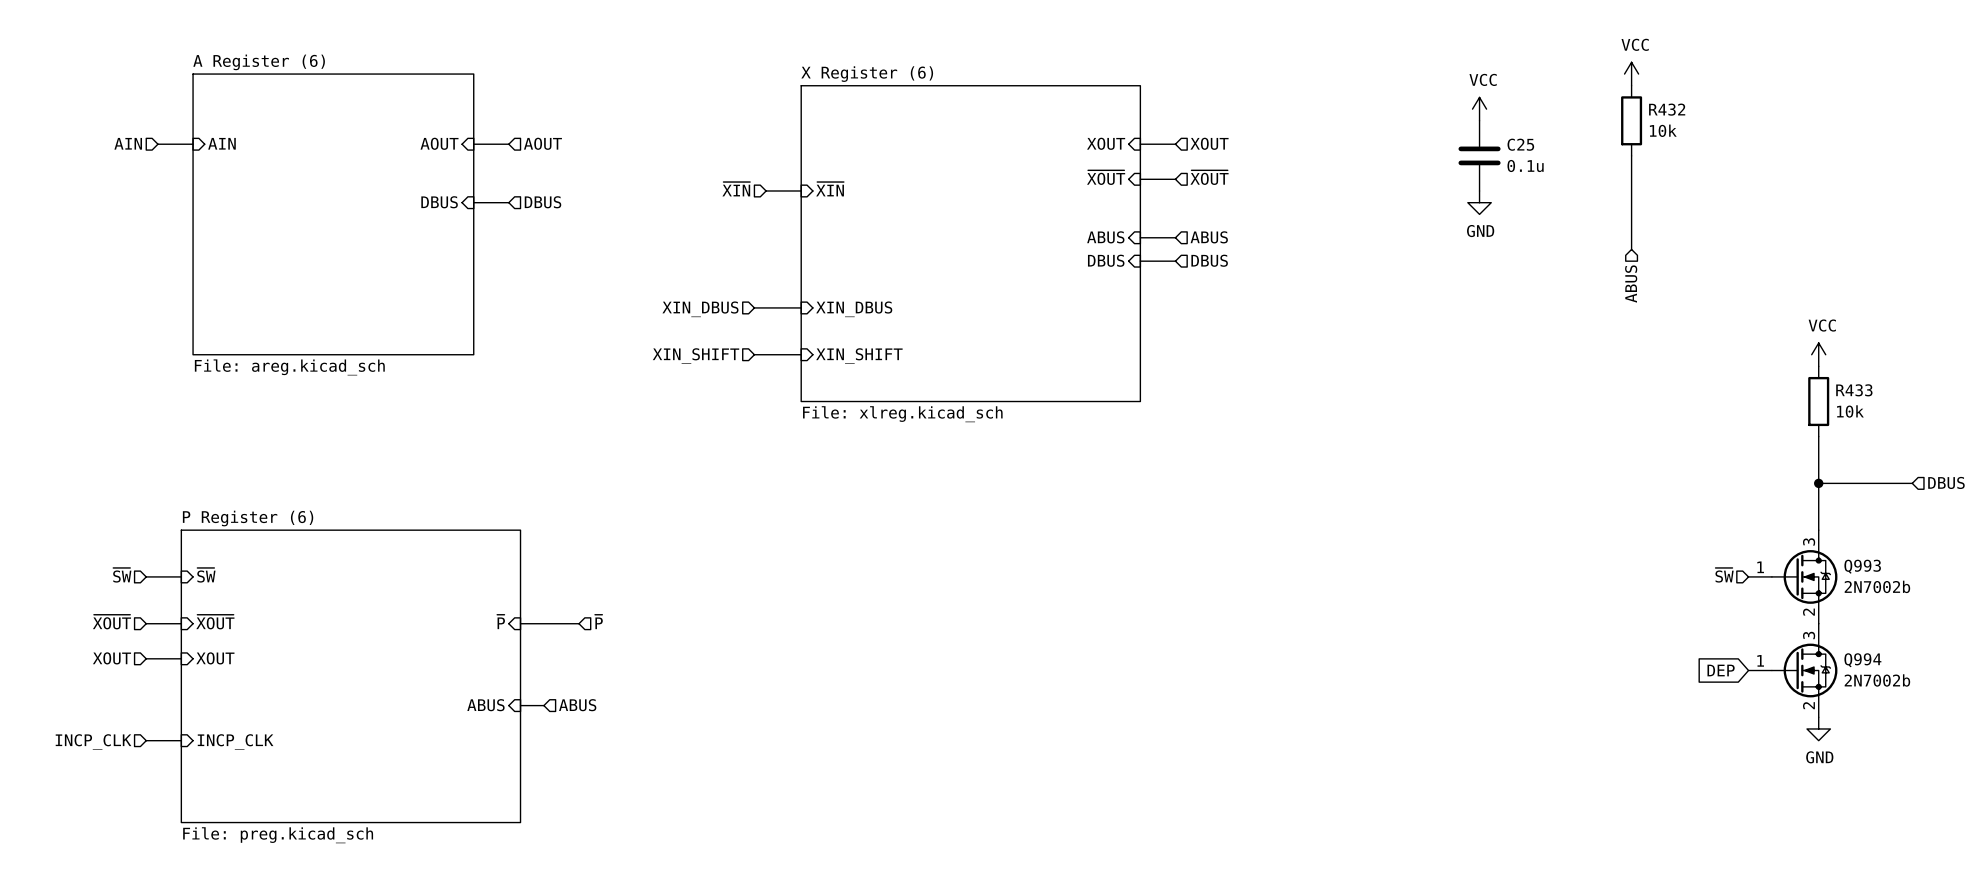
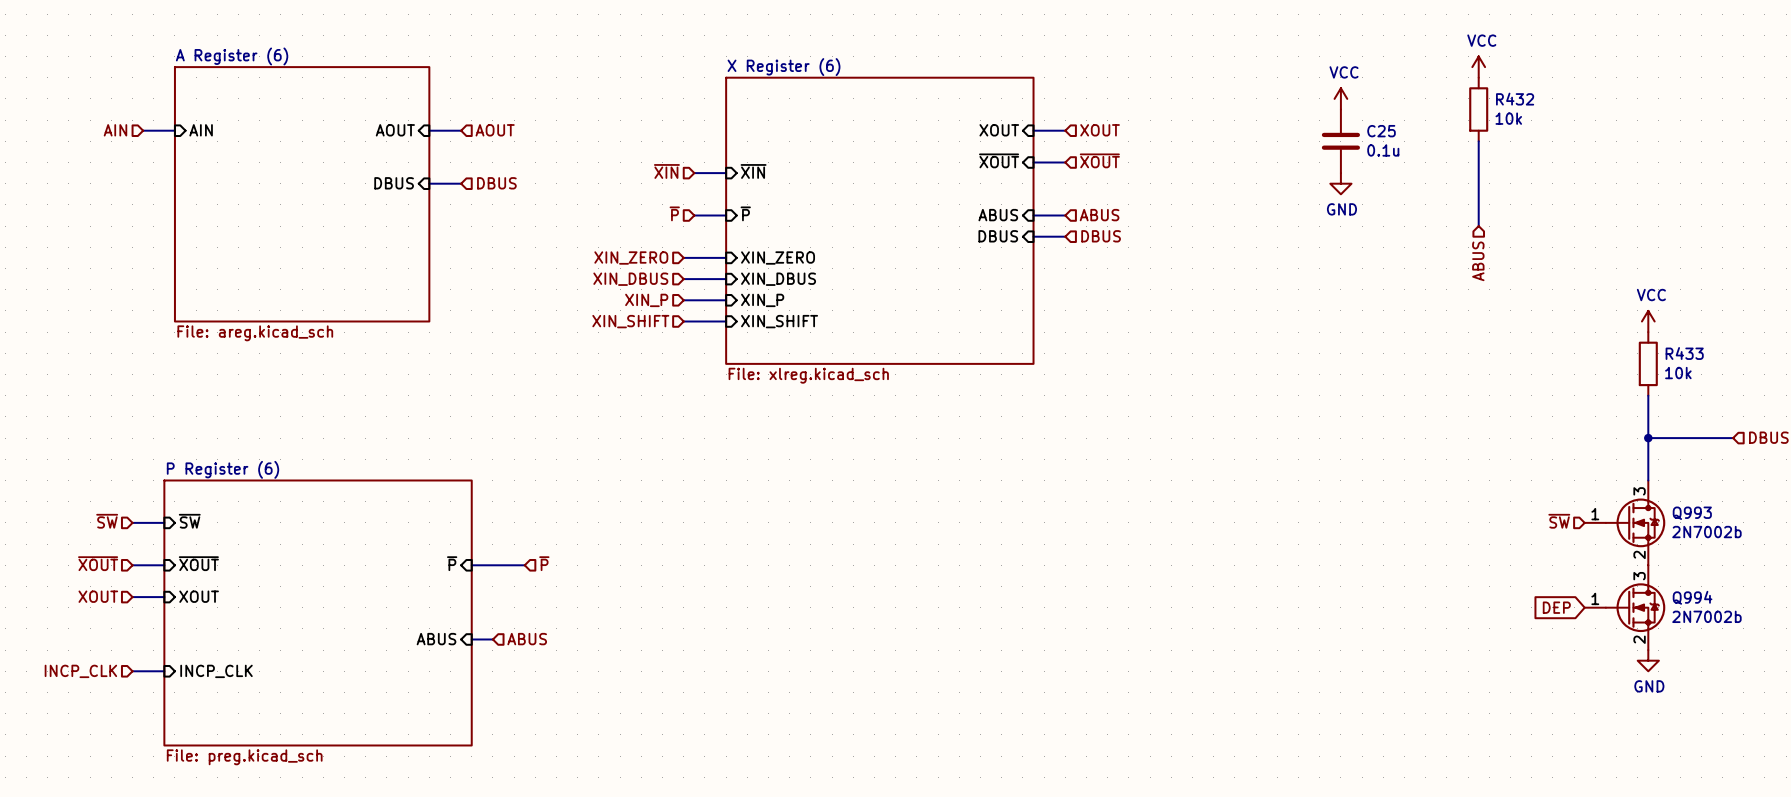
hierarchical label: none -> ~{P} (674, 213)
sheet pin: none -> ~{P} (745, 213)
wire: none -> (694, 215) (726, 215)
wire: none -> (683, 257) (726, 257)
hierarchical label: none -> XIN_ZERO (631, 258)
sheet pin: none -> XIN_ZERO (778, 258)
wire: none -> (683, 300) (726, 300)
hierarchical label: none -> XIN_P (646, 300)
sheet pin: none -> XIN_P (762, 300)

